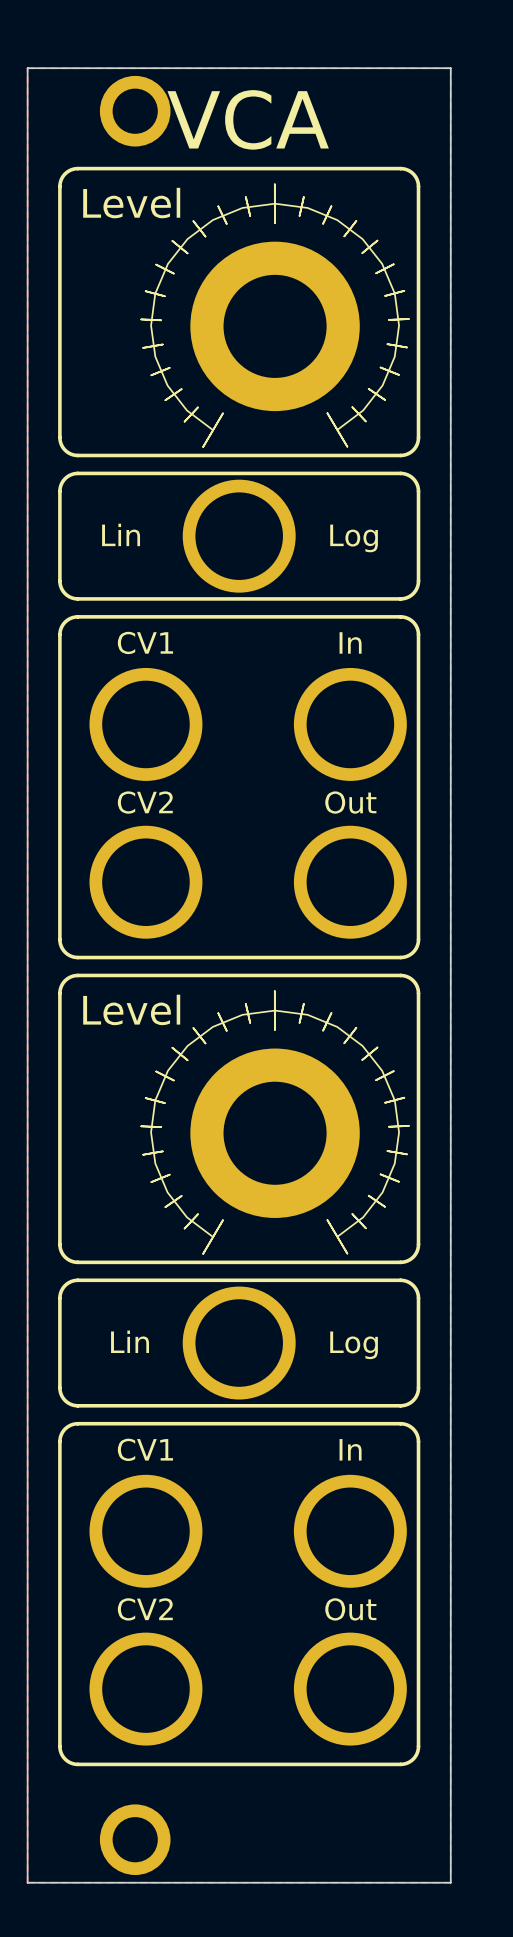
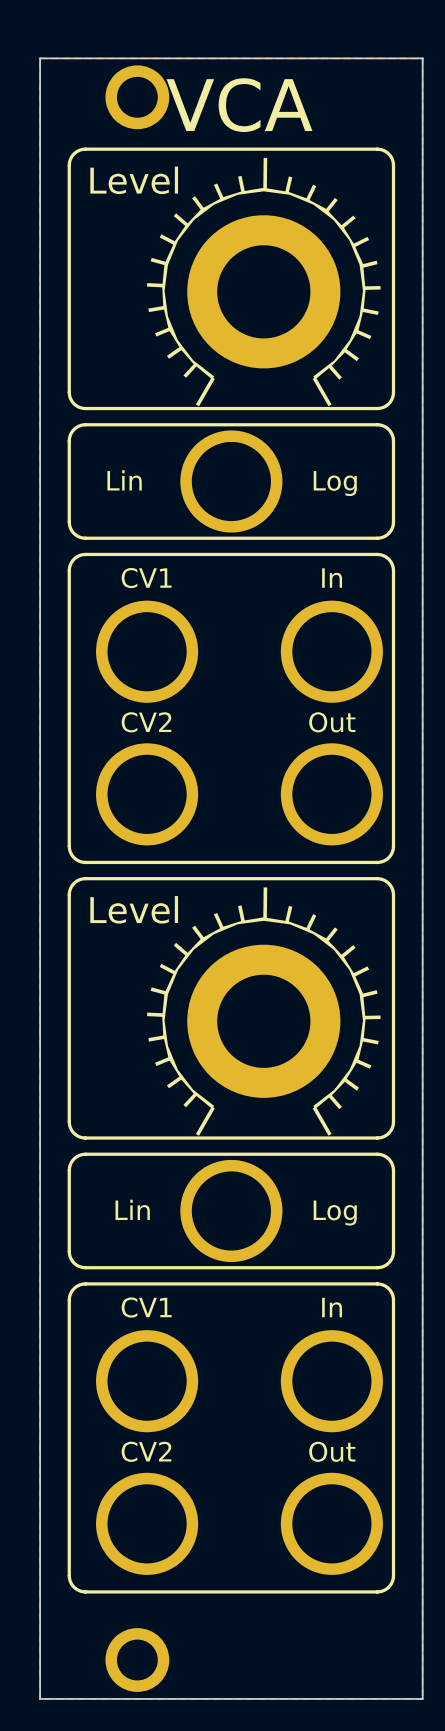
drawing shape: [141, 184, 410, 448] -> [147, 157, 381, 407]
drawing shape: [141, 990, 410, 1255] -> [147, 887, 381, 1136]

